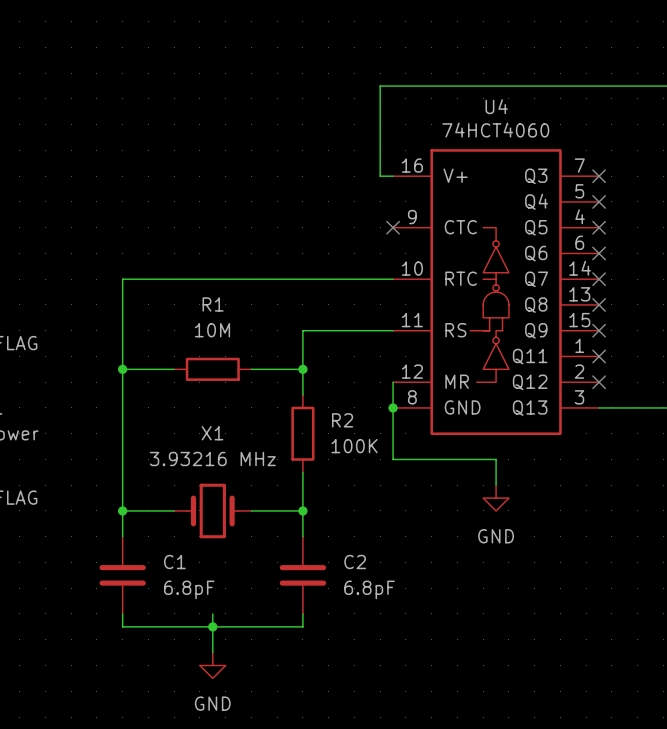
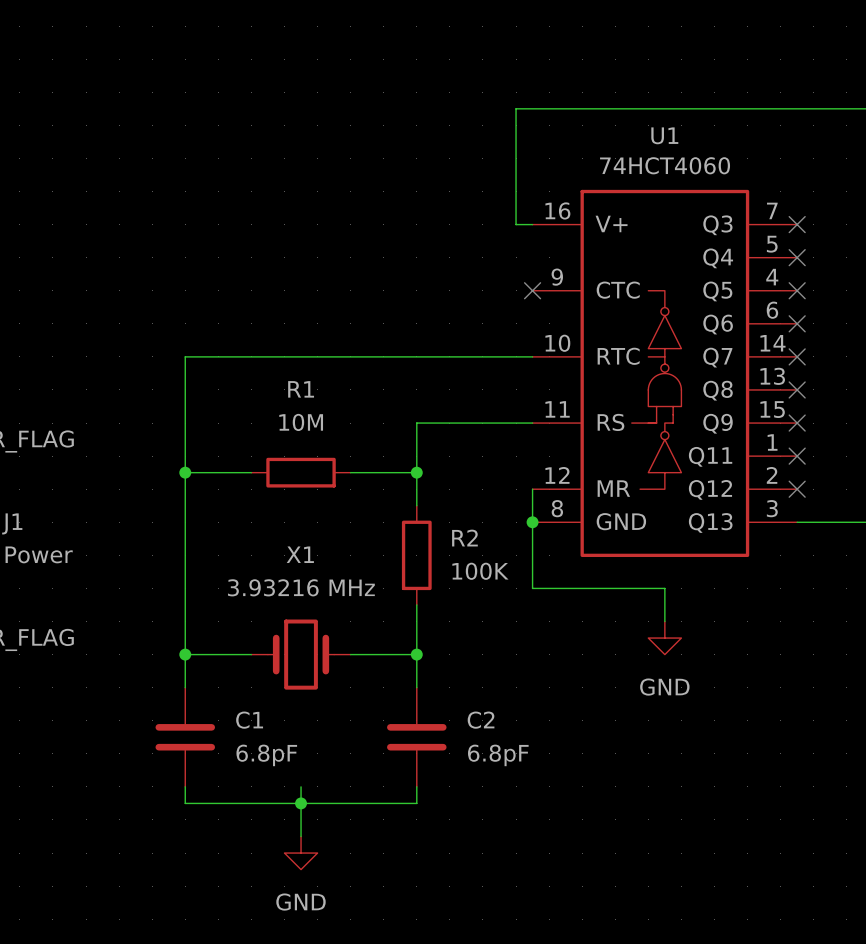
U4 name: U4 (496, 106) -> U1 (664, 135)

